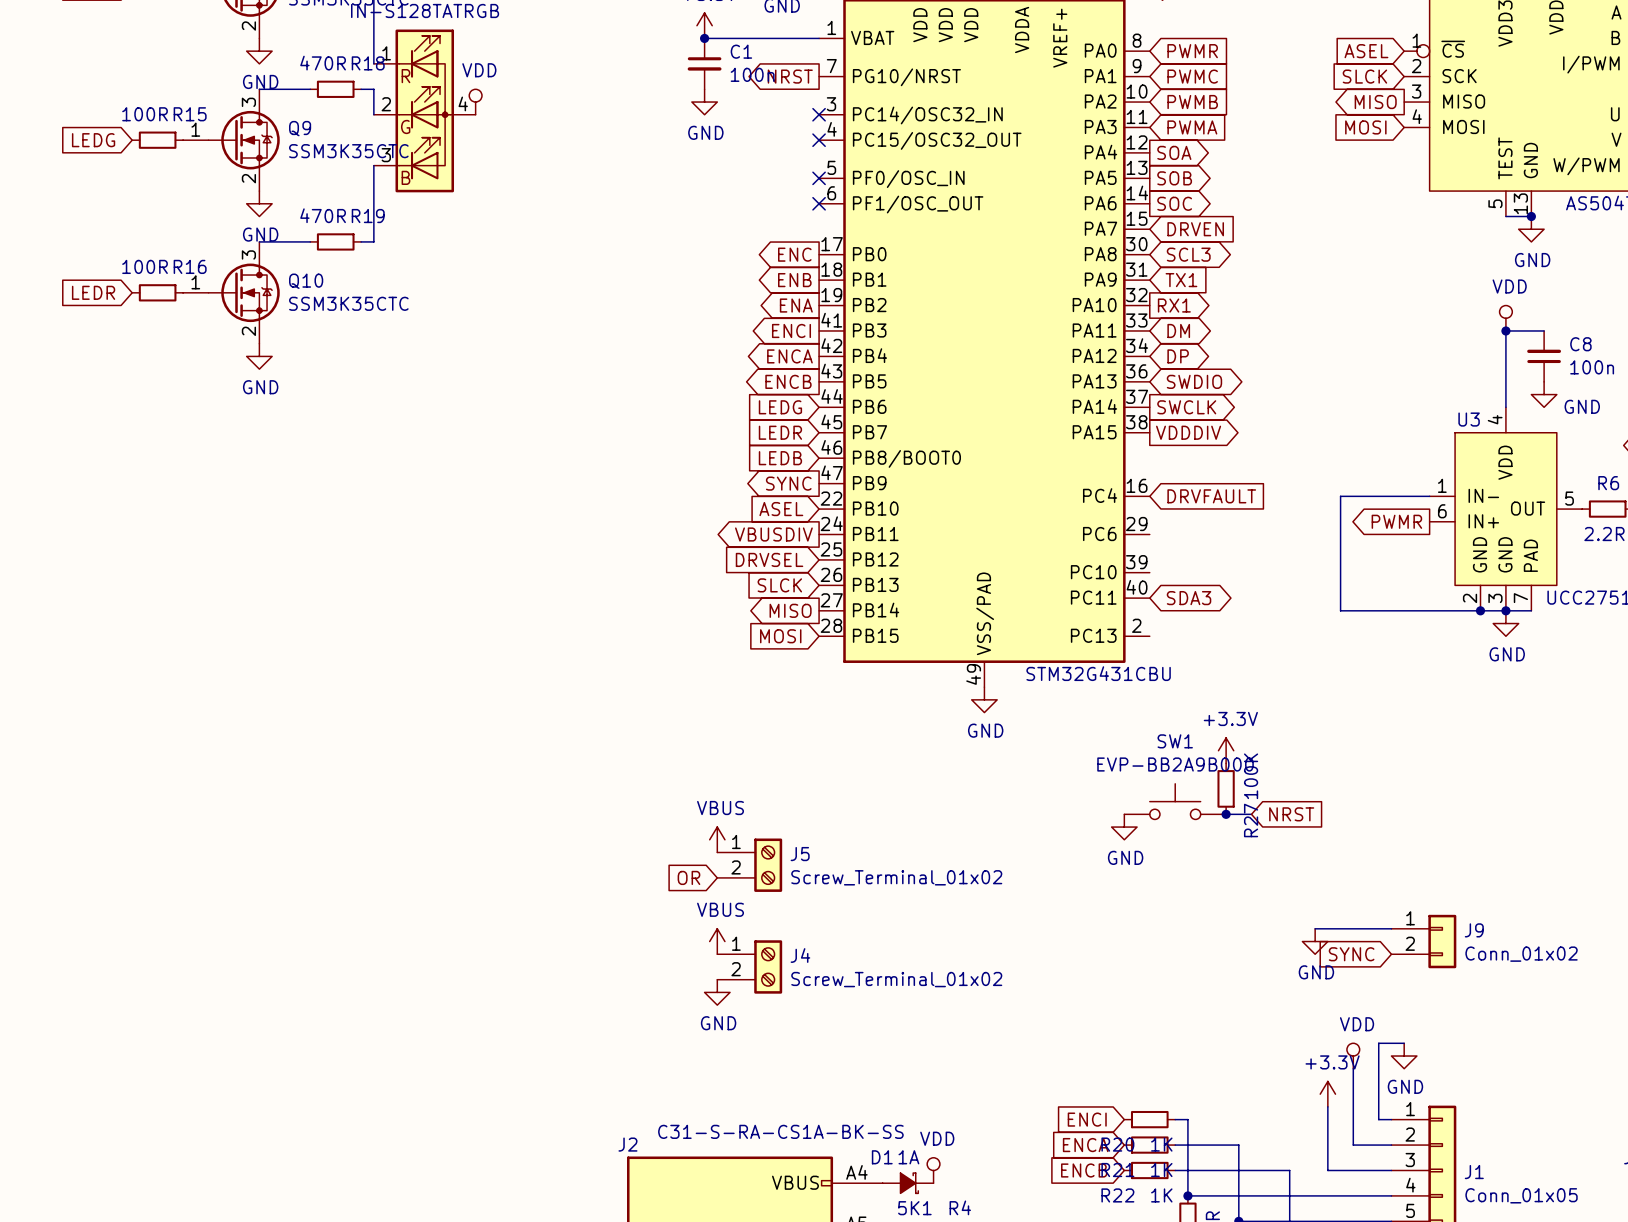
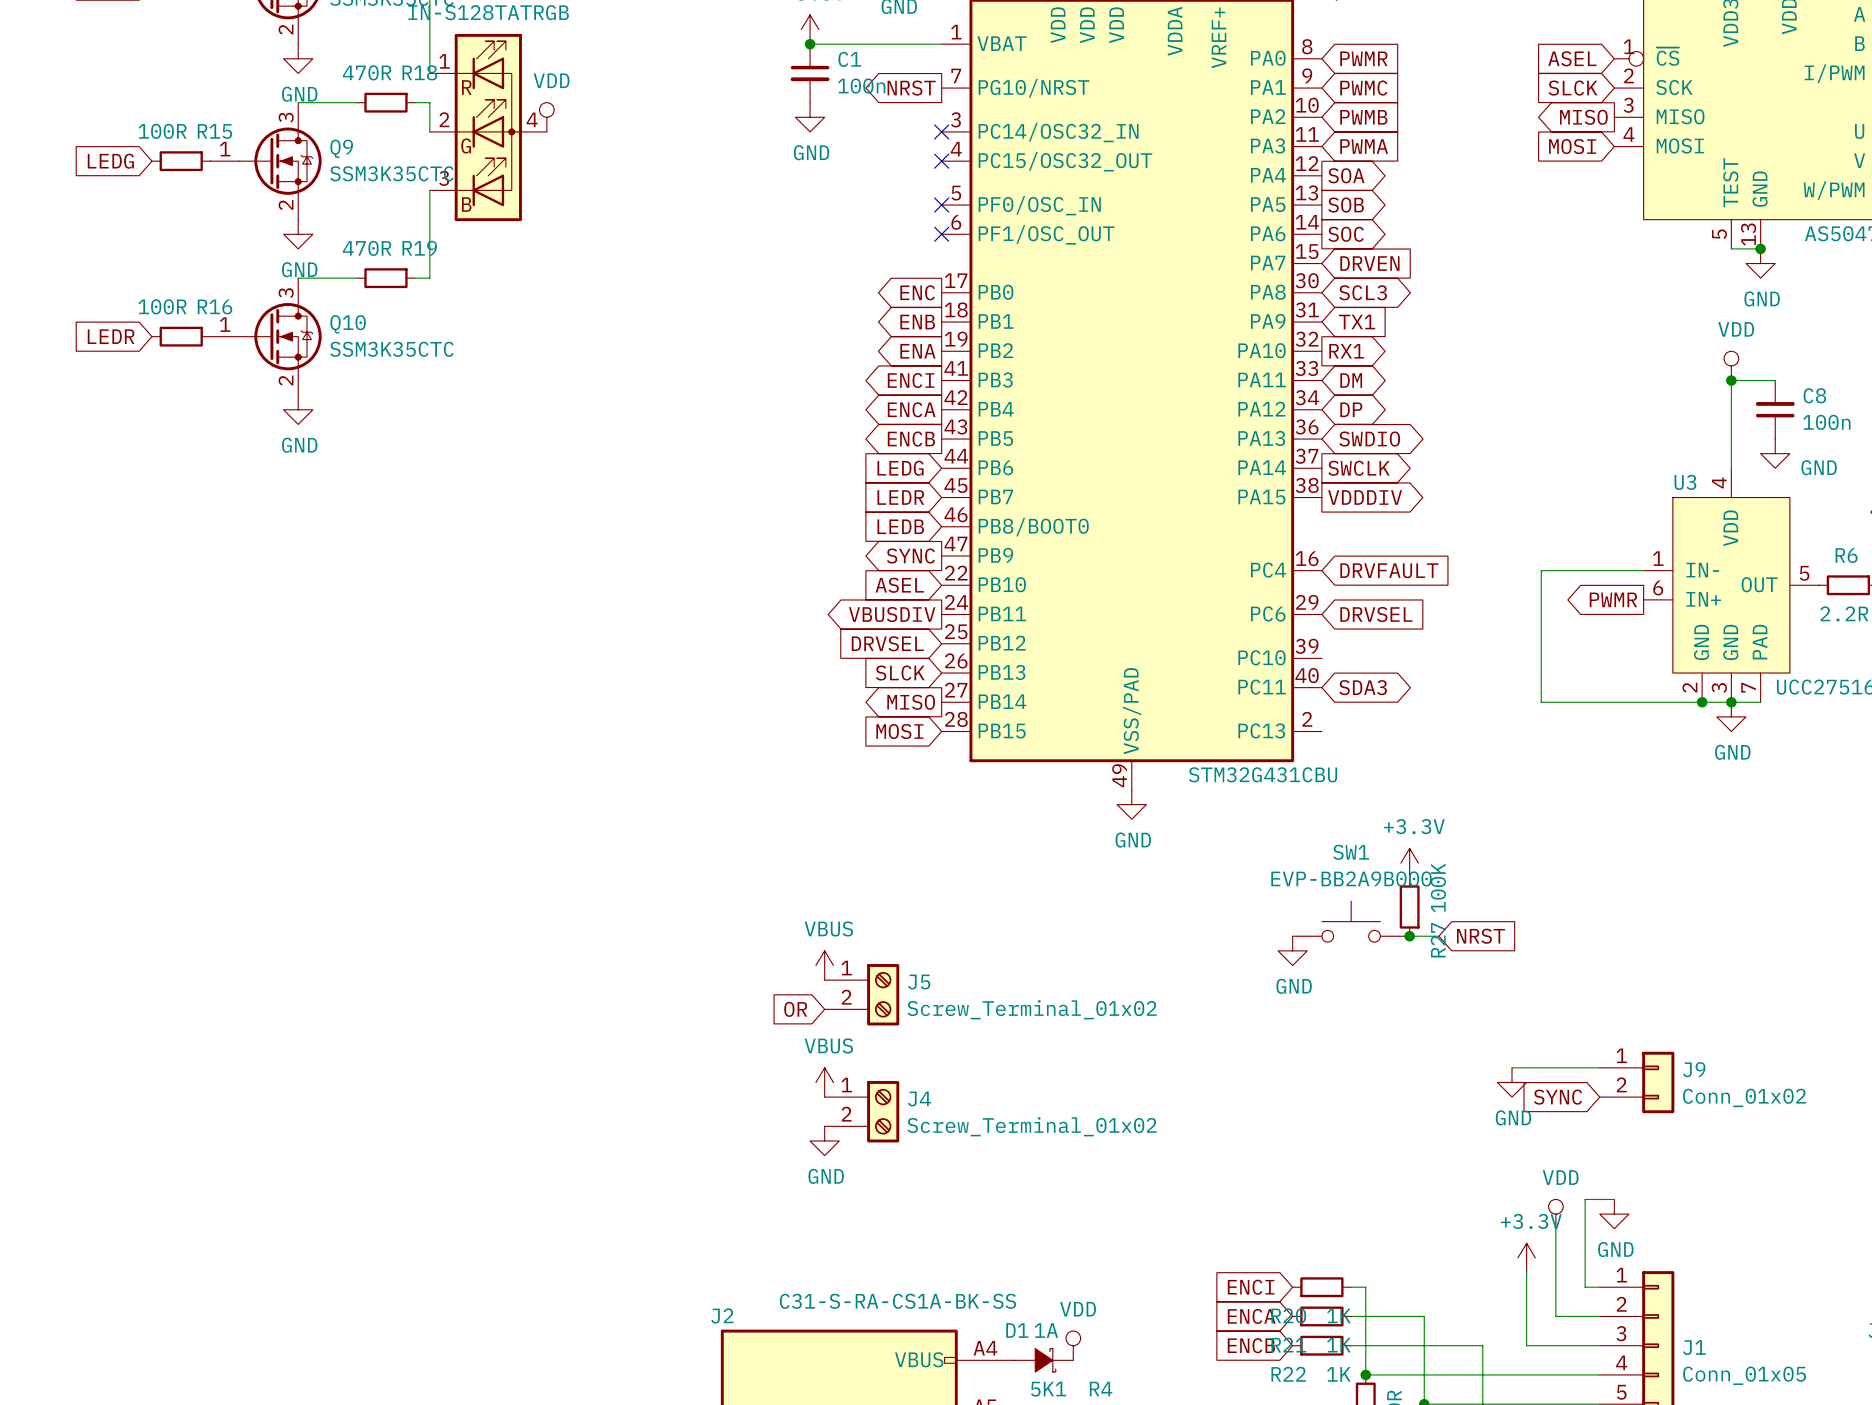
global label: none -> DRVSEL (1376, 614)

